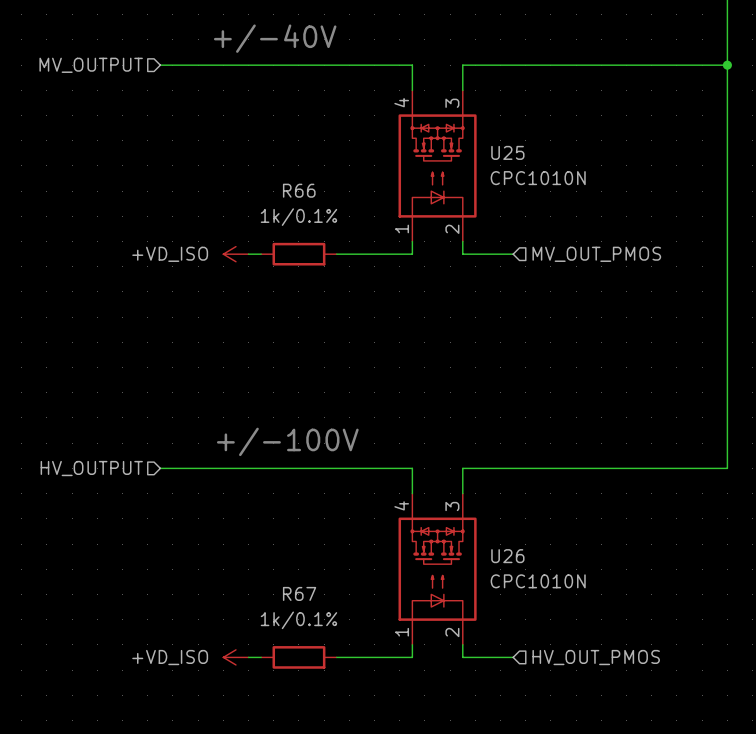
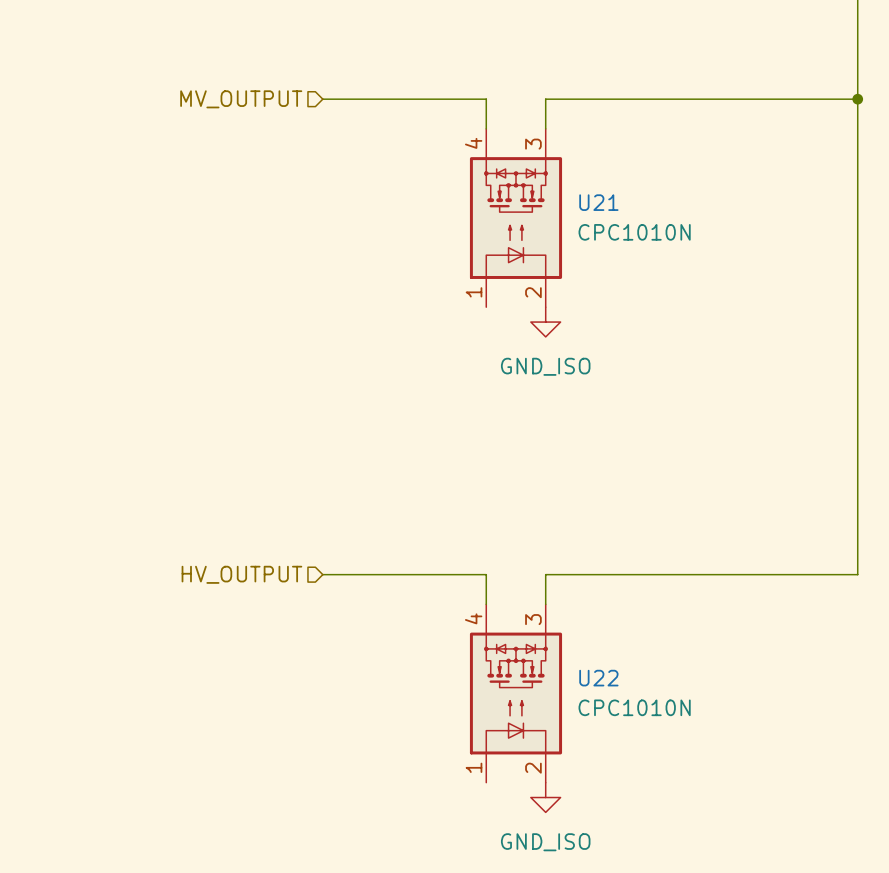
text: +/-40V (275, 38) -> none
hierarchical label position: MV_OUTPUT (91, 65) -> MV_OUTPUT (241, 99)
wire: (160, 65) (273, 65) -> none
U25 name: U25 (507, 152) -> U21 (598, 202)
wire: (412, 241) (412, 254) (336, 254) -> none
wire: (462, 241) (462, 254) (513, 254) -> none
power symbol: +VD_ISO (235, 254) -> none
wire: (248, 254) (261, 254) -> none
R66: 1k/0.1% (298, 254) -> none
power symbol: none -> GND_ISO (545, 322)
hierarchical label: MV_OUT_PMOS (596, 254) -> none
text: +/-100V (287, 441) -> none
hierarchical label position: HV_OUTPUT (91, 468) -> HV_OUTPUT (241, 574)
wire: (160, 468) (273, 468) -> none
U26 name: U26 (507, 556) -> U22 (598, 678)
wire: (412, 644) (412, 657) (336, 657) -> none
wire: (462, 644) (462, 657) (513, 657) -> none
power symbol: +VD_ISO (235, 657) -> none
wire: (248, 657) (261, 657) -> none
R67: 1k/0.1% (298, 657) -> none
power symbol: none -> GND_ISO (545, 797)
hierarchical label: HV_OUT_PMOS (596, 657) -> none

